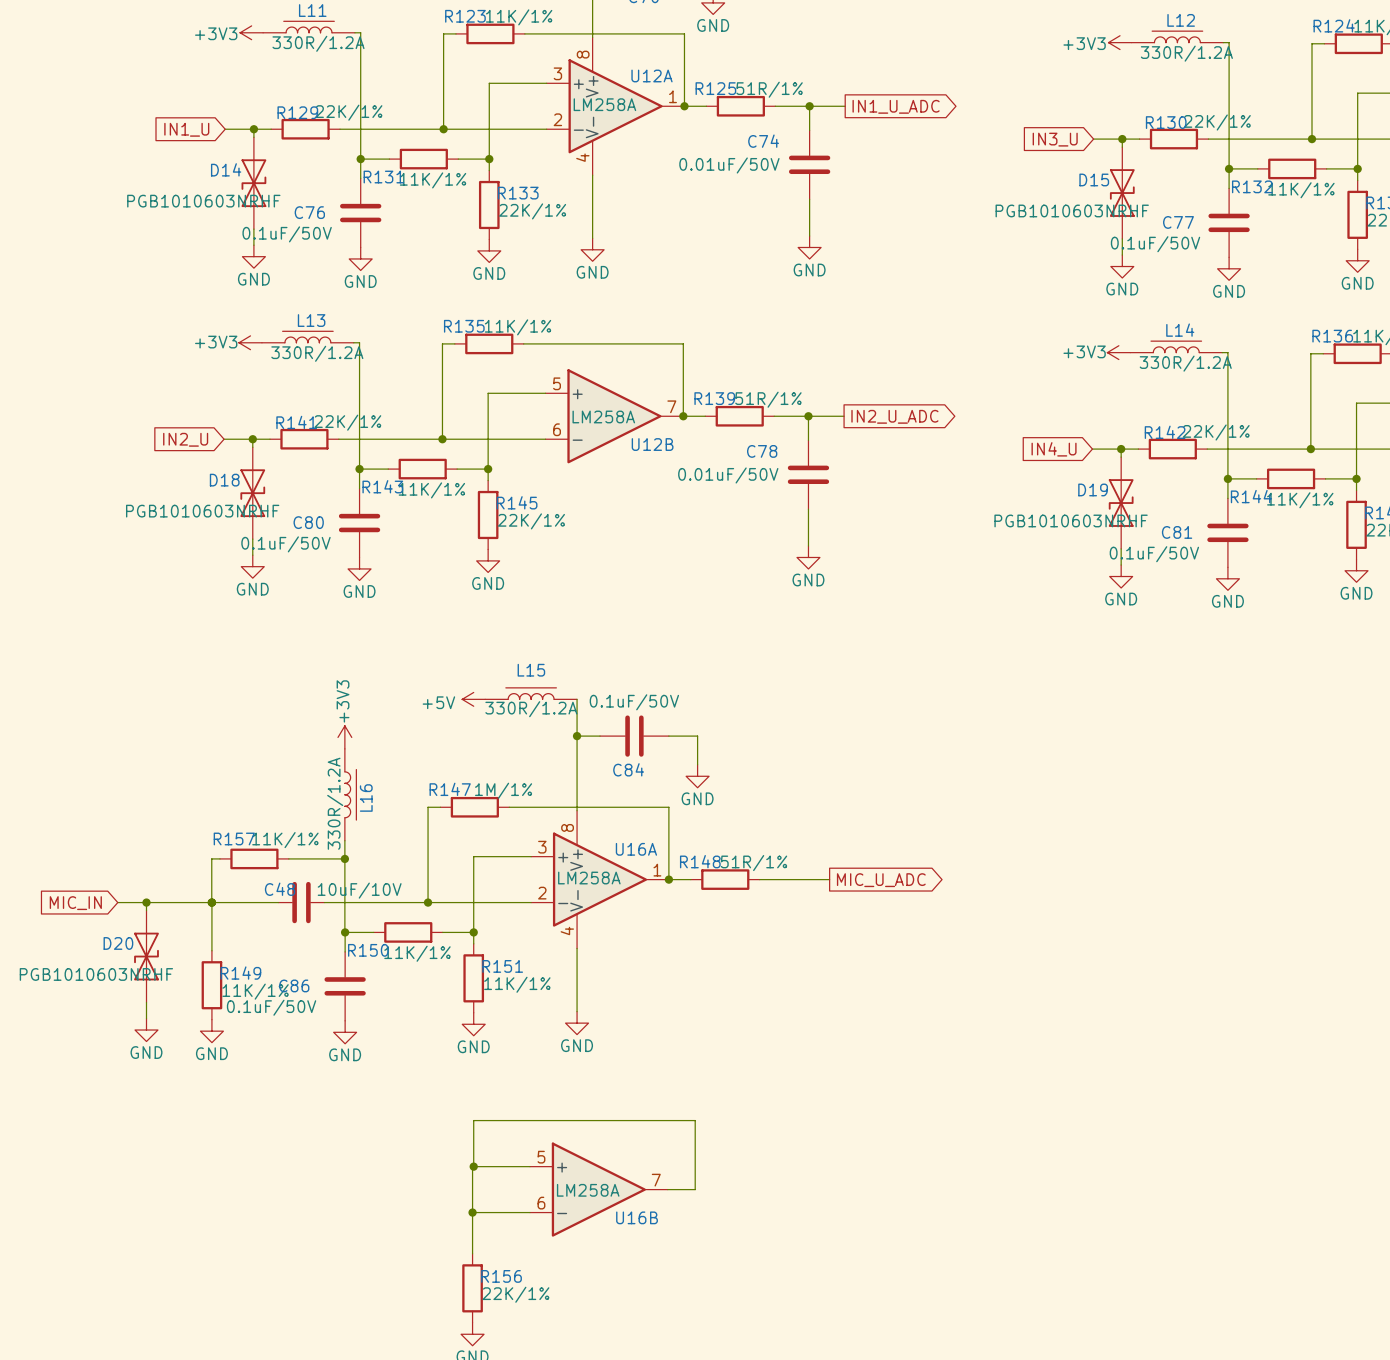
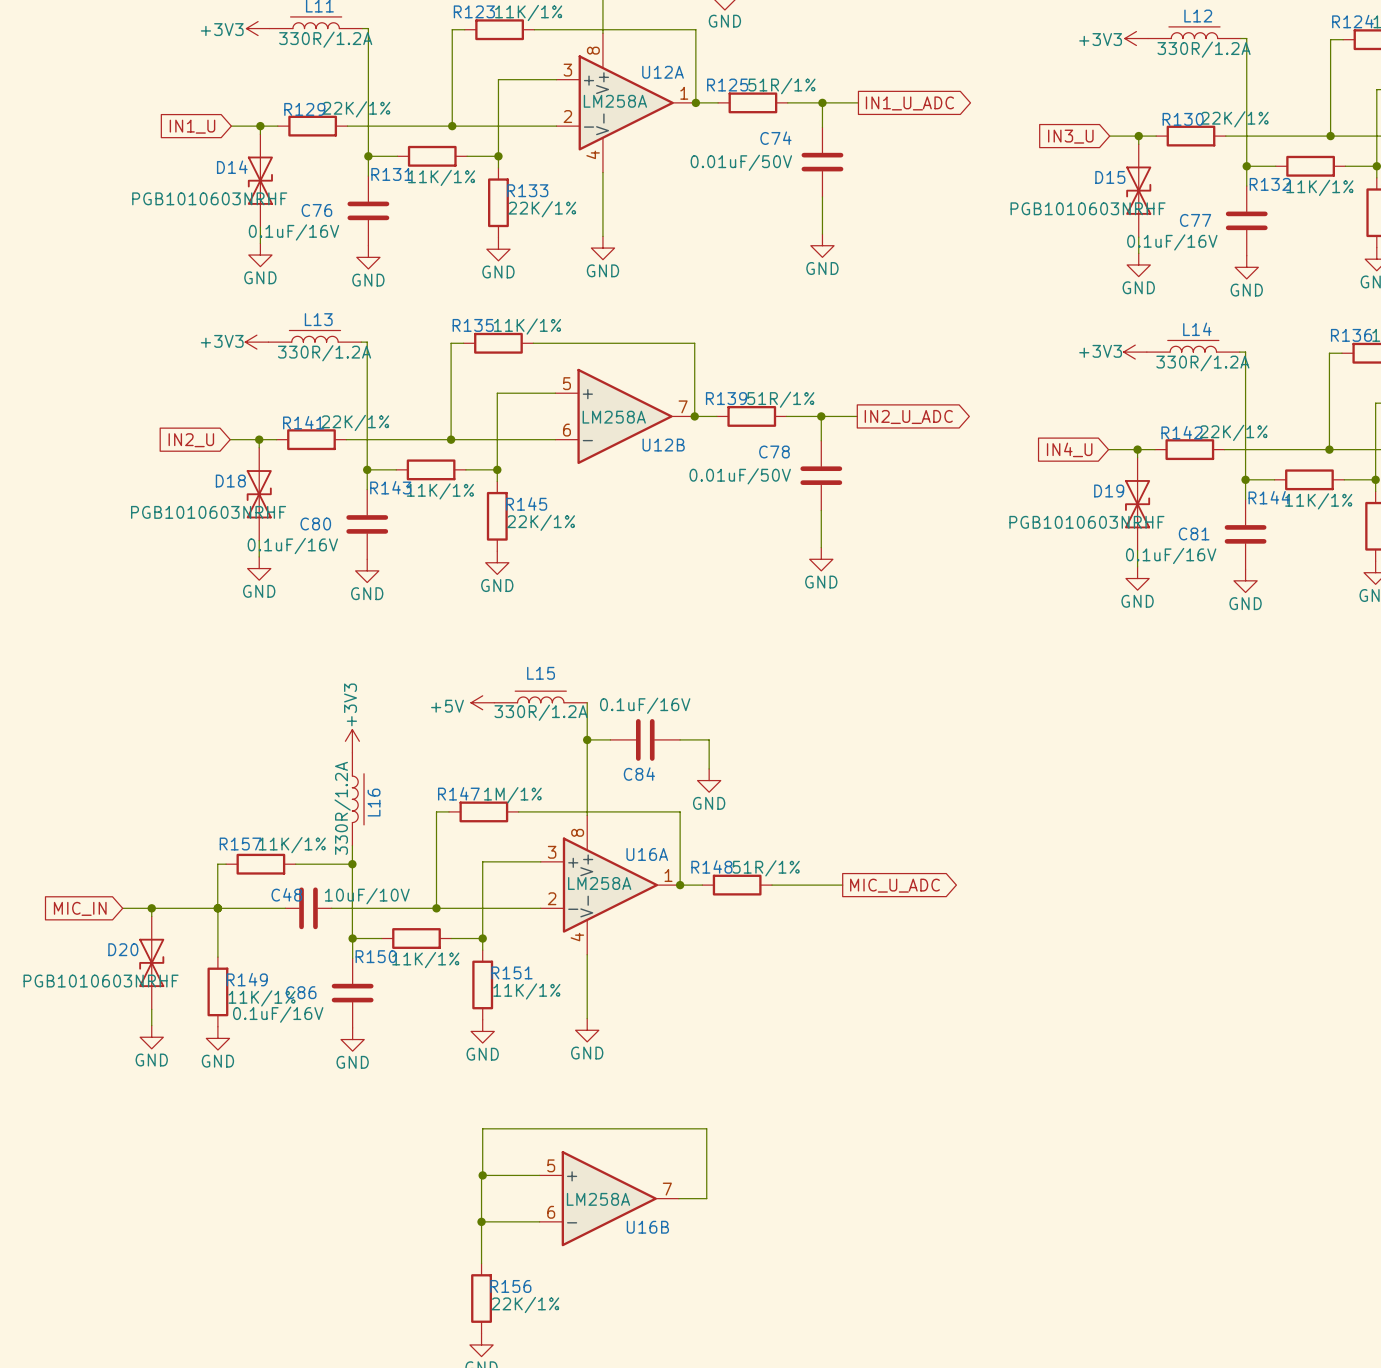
C76 value: 0.1uF/50V (287, 234) -> 0.1uF/16V (293, 232)
C77 value: 0.1uF/50V (1155, 244) -> 0.1uF/16V (1172, 242)
C80 value: 0.1uF/50V (285, 544) -> 0.1uF/16V (292, 546)
C81 value: 0.1uF/50V (1154, 554) -> 0.1uF/16V (1171, 555)
C84 value: 0.1uF/50V (634, 702) -> 0.1uF/16V (645, 705)
C86 value: 0.1uF/50V (271, 1007) -> 0.1uF/16V (278, 1014)

